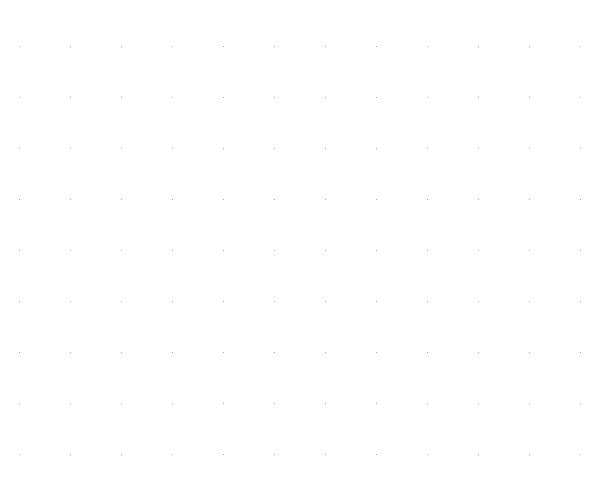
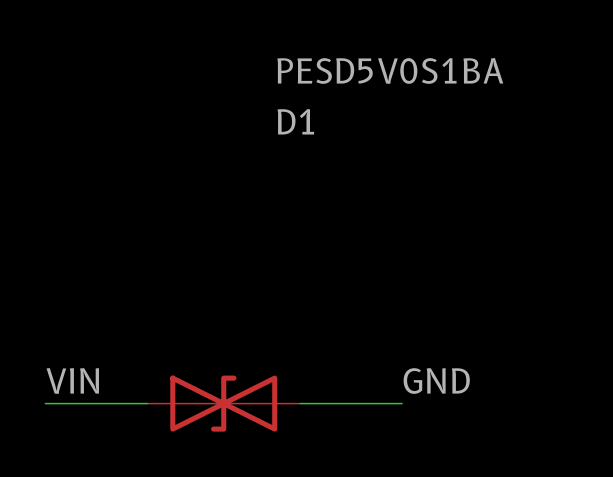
label: none -> VIN (72, 381)
label: none -> GND (436, 381)
wire: none -> (45, 403) (147, 403)
D1: none -> PESD5V0S1BA (223, 403)
wire: none -> (300, 403) (402, 403)

